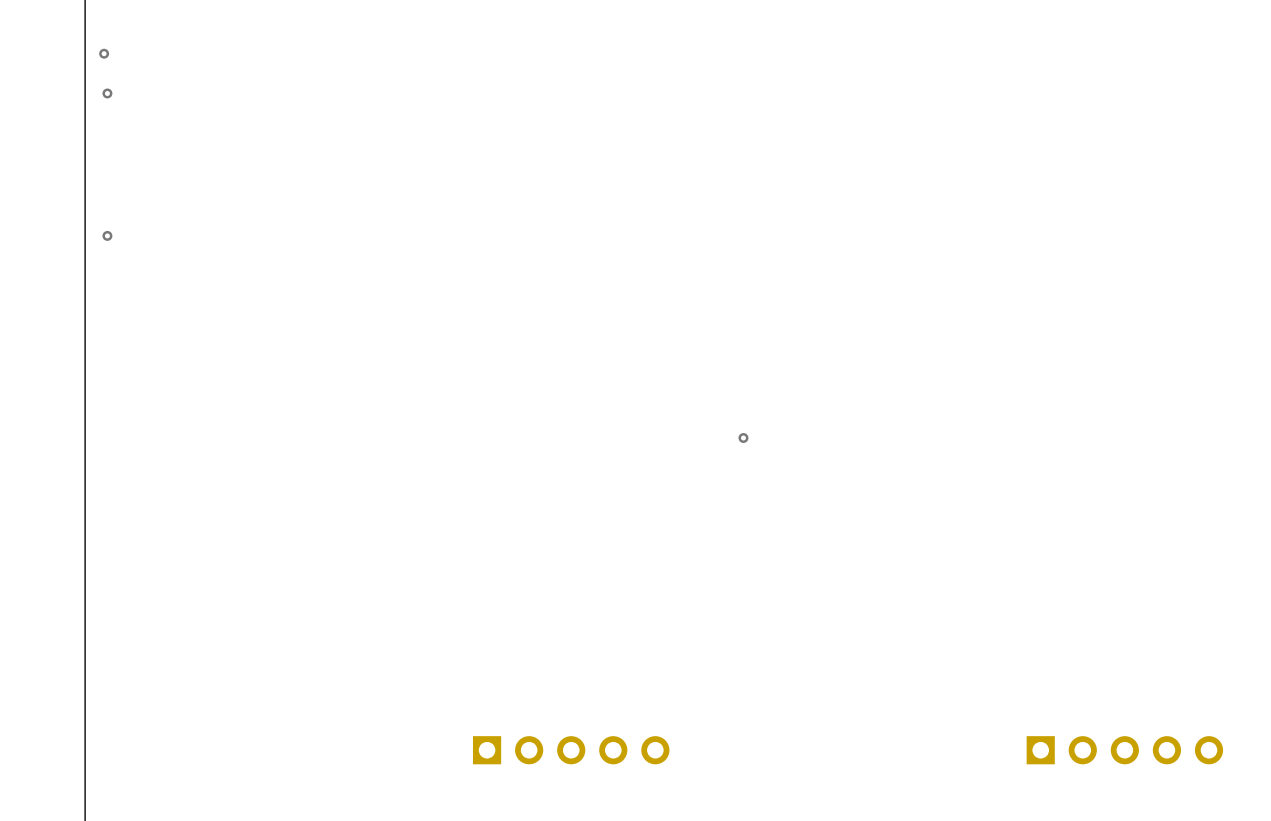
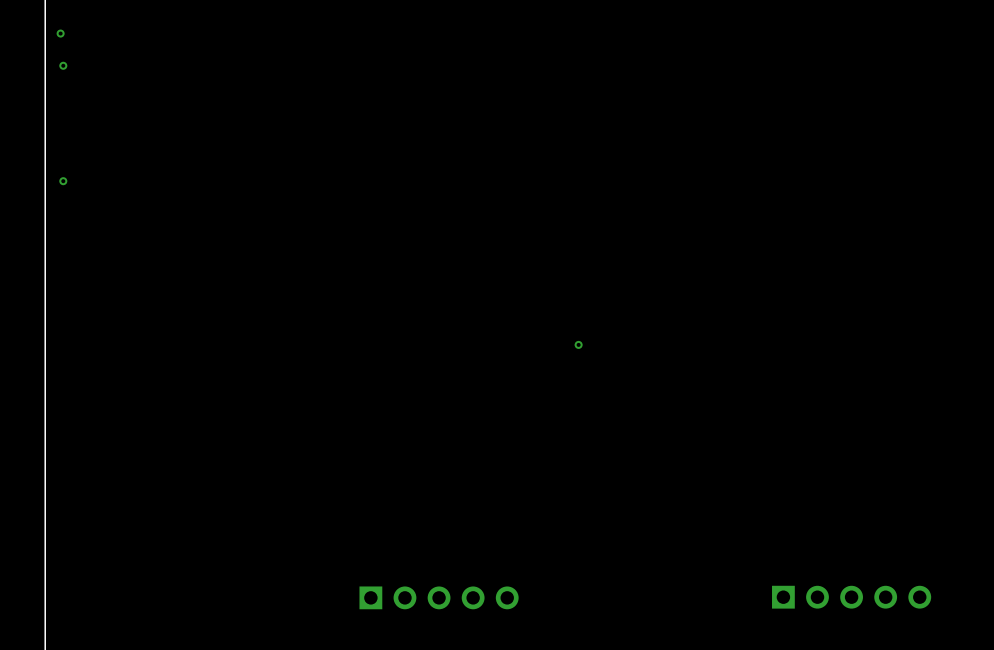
part position: (1124, 750) -> (851, 597)

